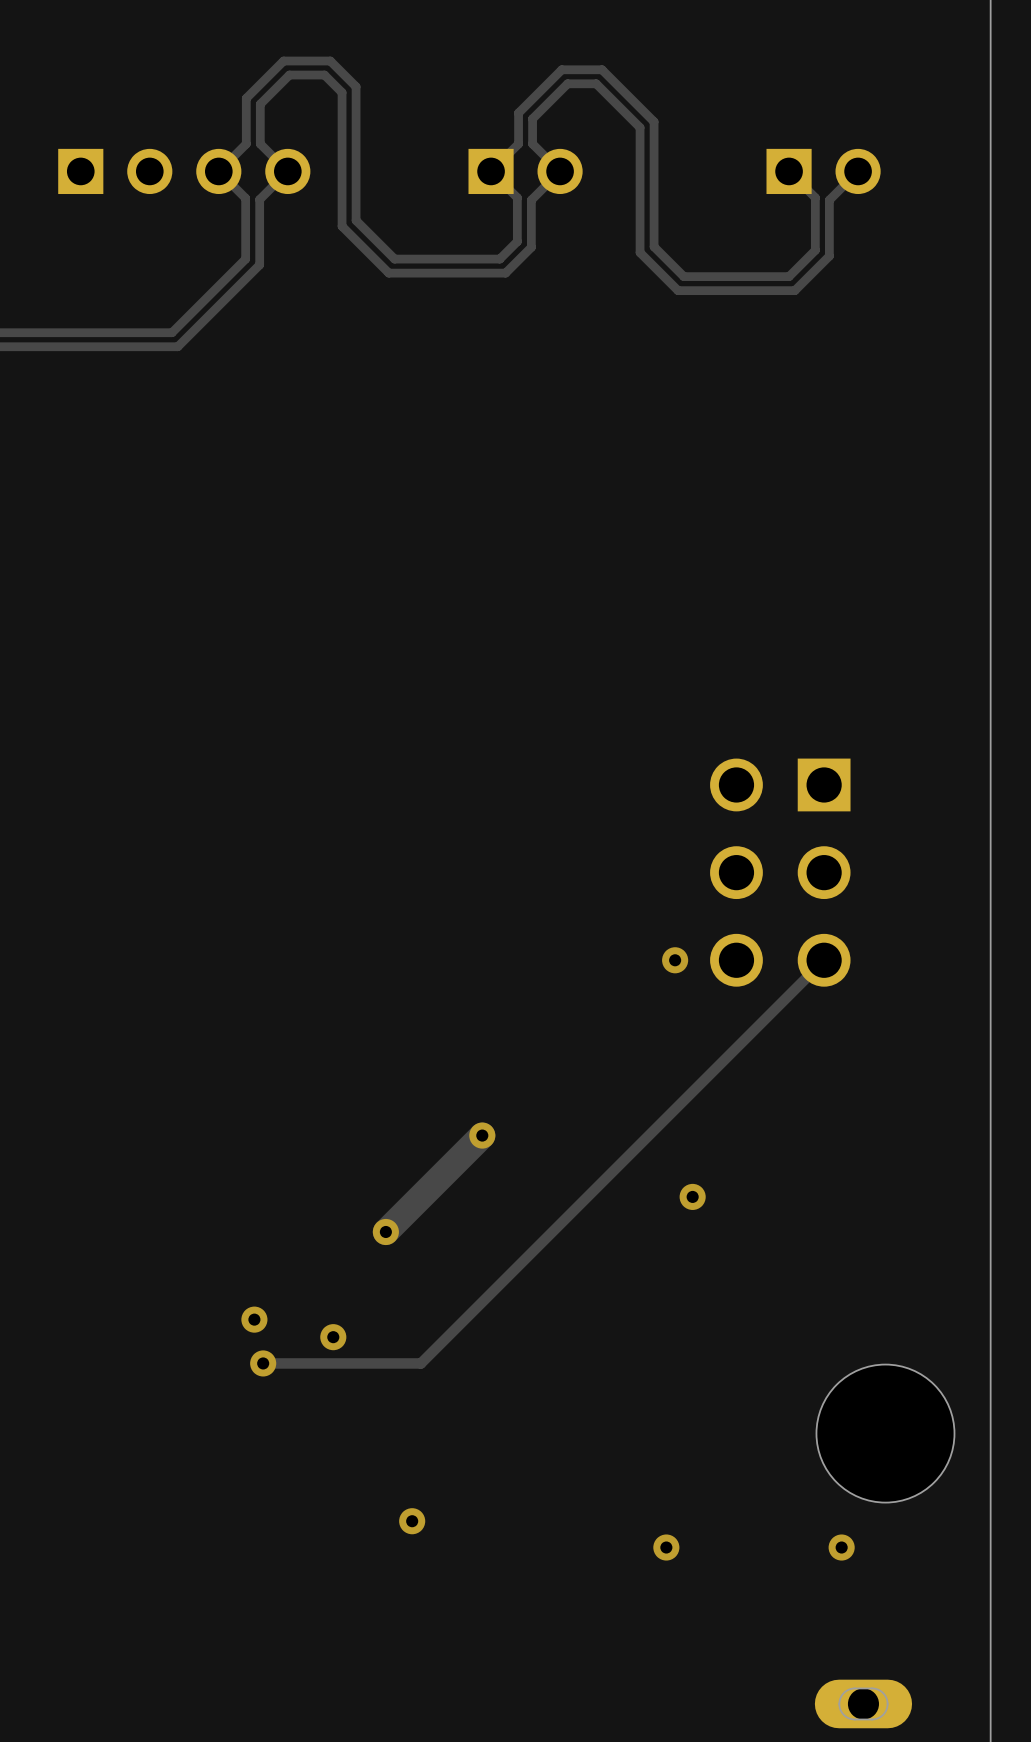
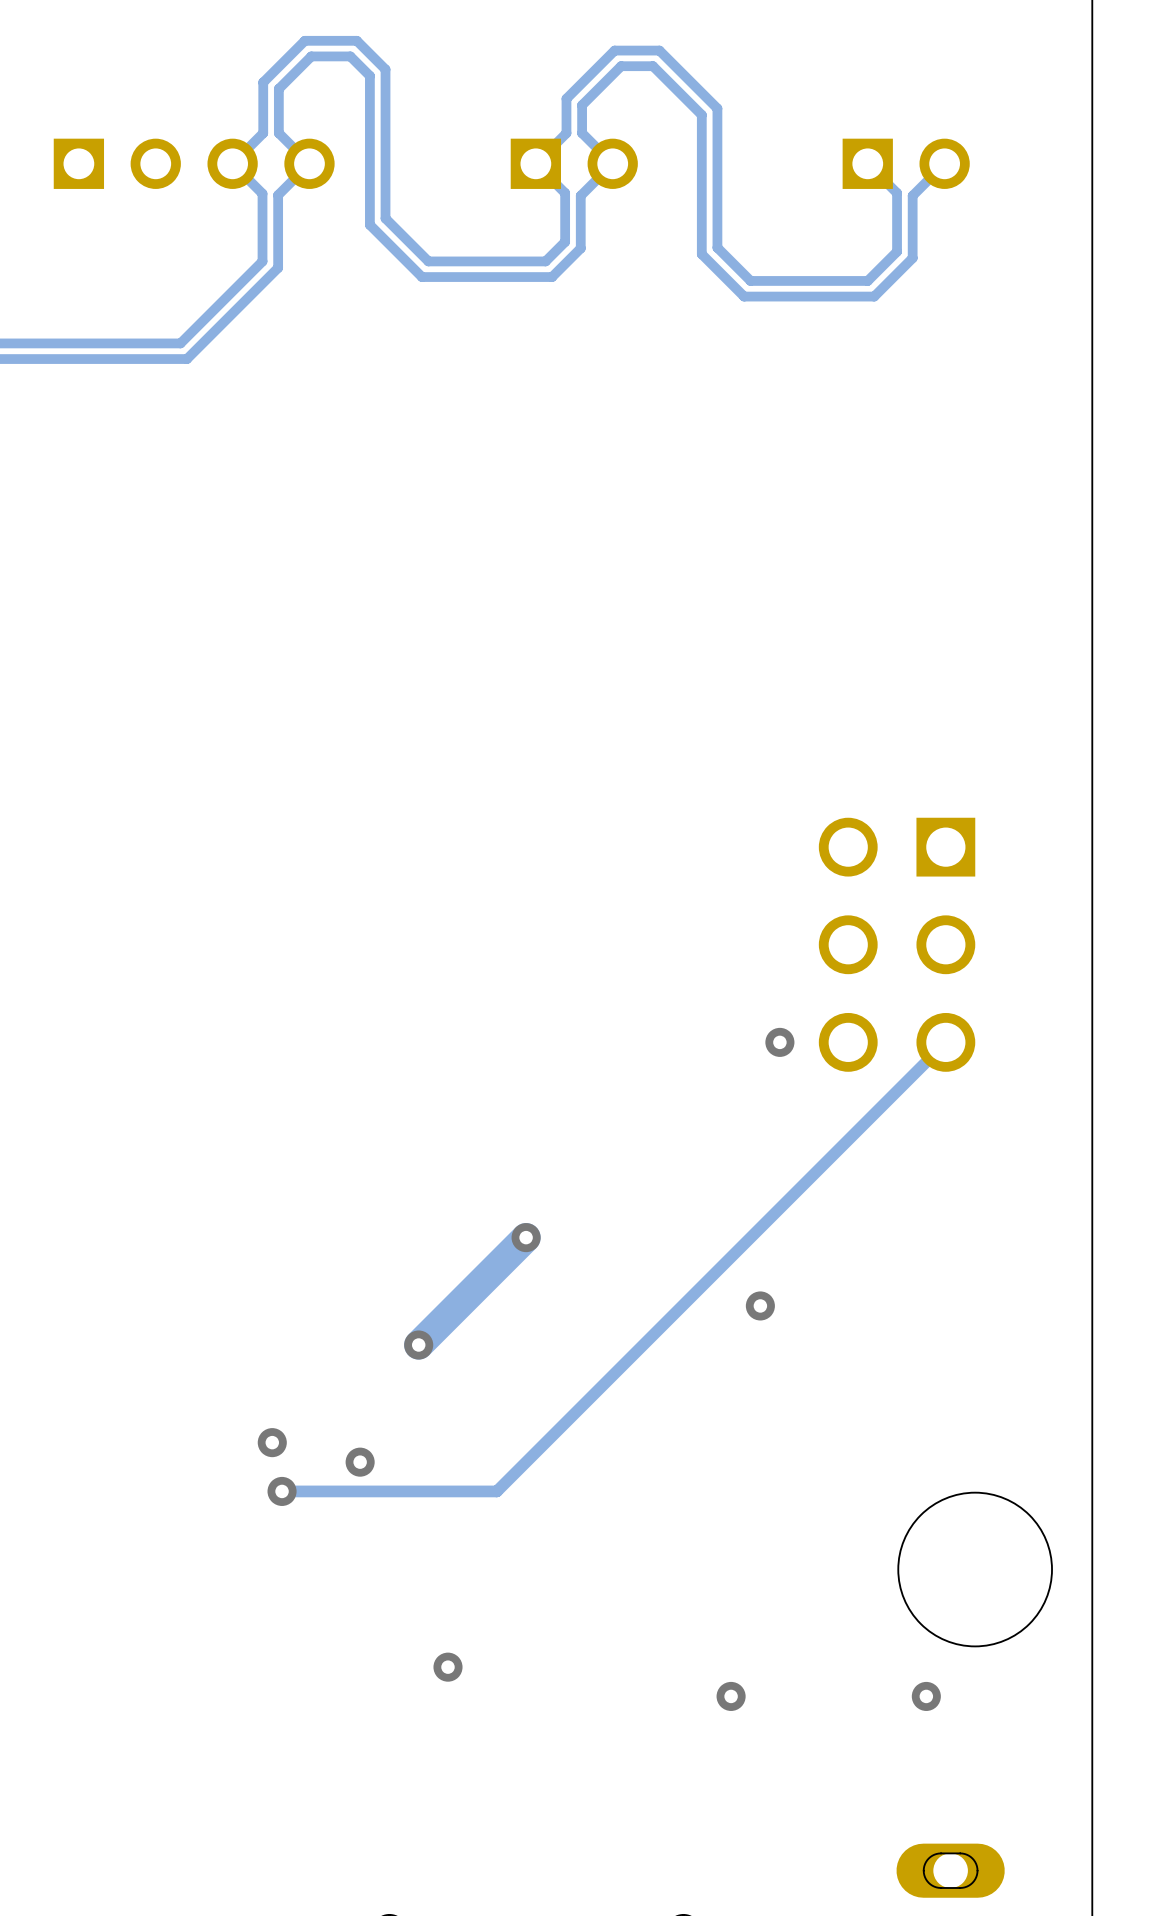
part position: (780, 872) -> (897, 944)
via position: (675, 960) -> (779, 1042)
track: (824, 960) (420, 1363) -> (945, 1042) (496, 1491) (457, 1491)

